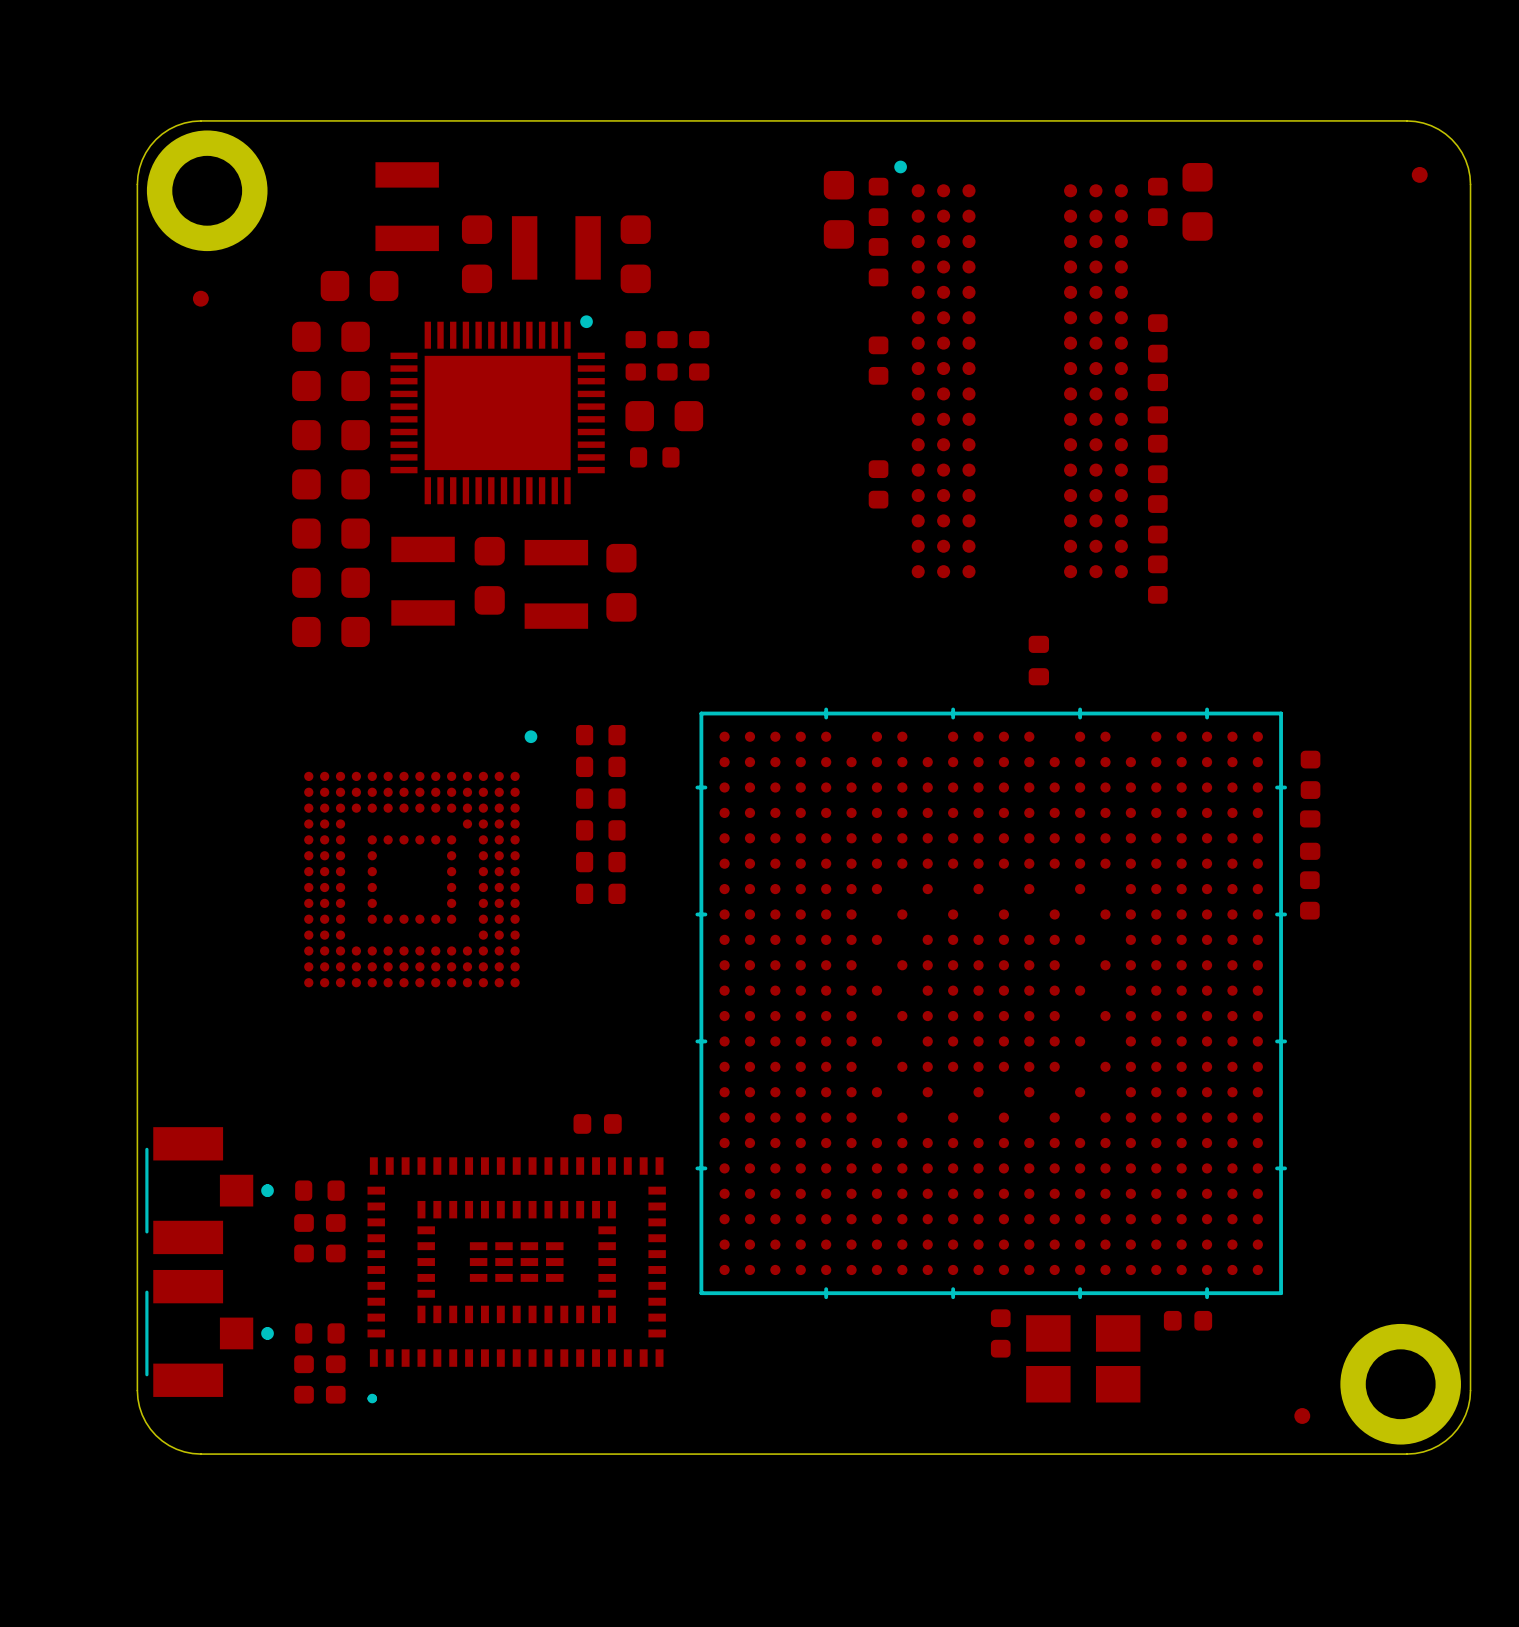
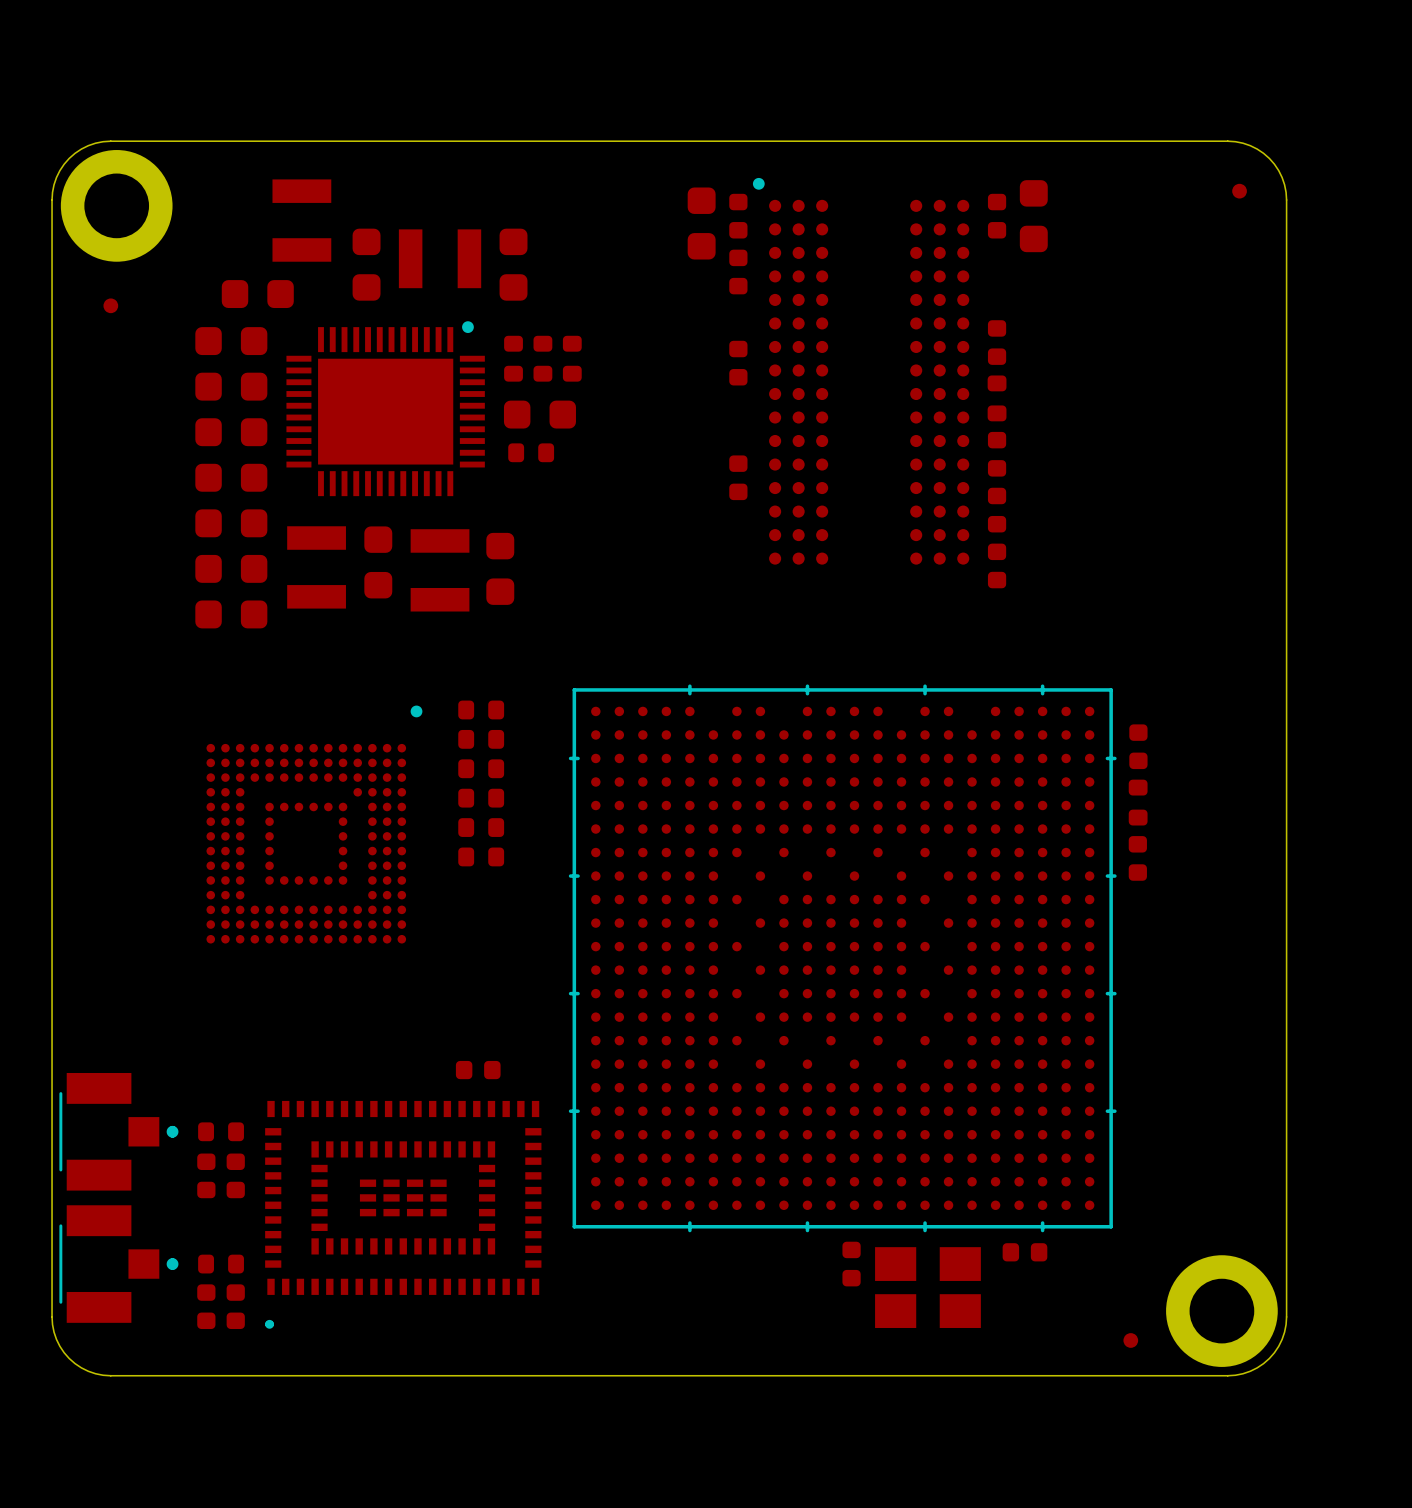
part: (1038, 660) -> none

